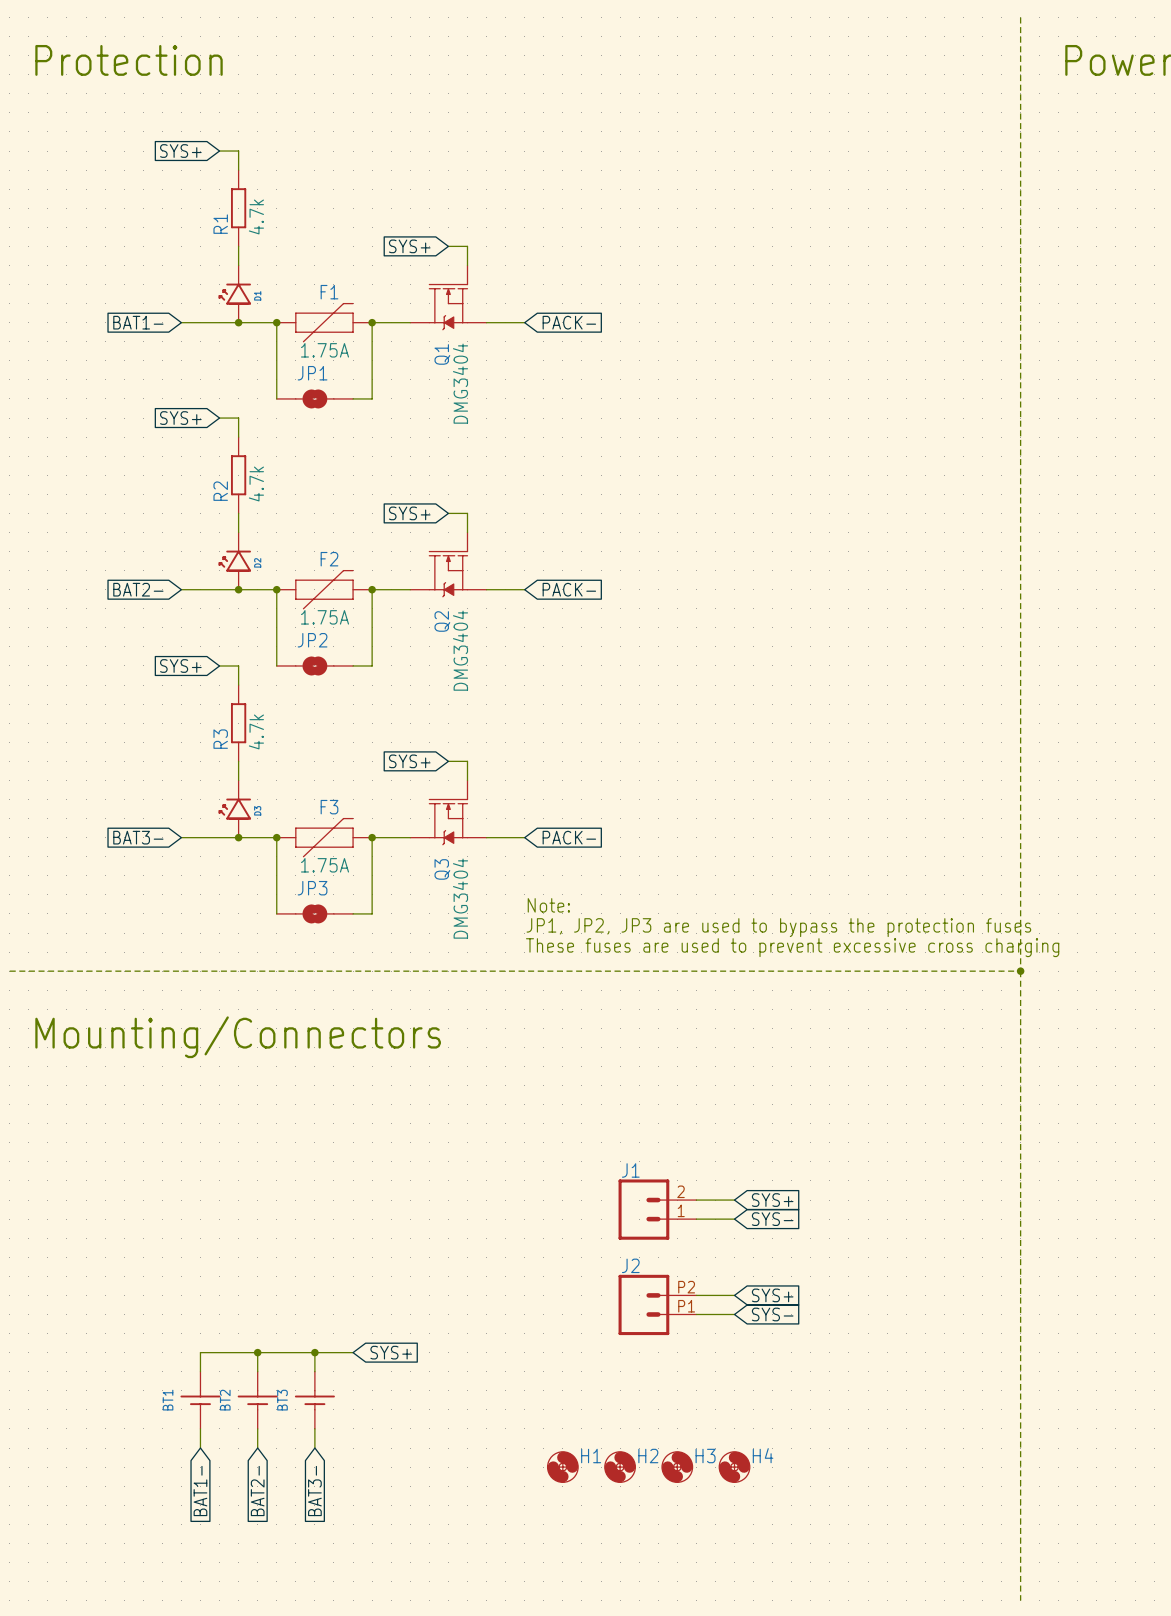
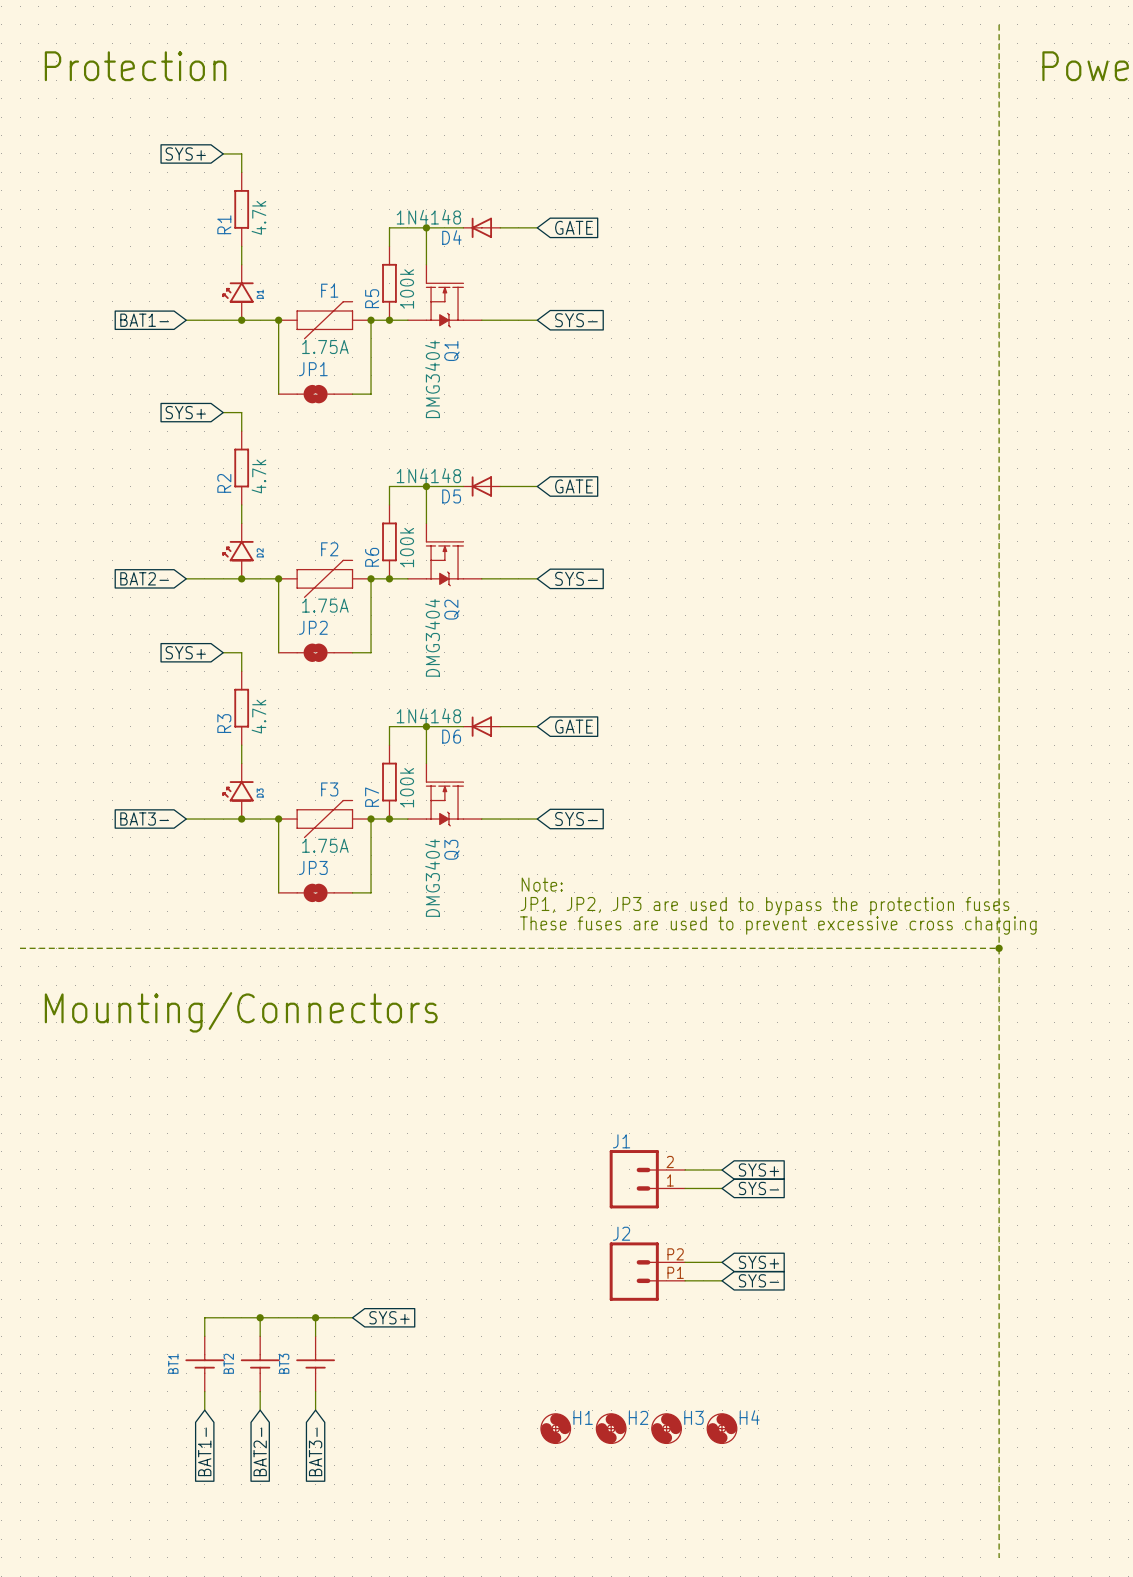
wire: none -> (426, 227) (426, 264)
junction: none -> (426, 227)
wire: none -> (463, 227) (389, 227) (389, 246)
D4: none -> 1N4148 (481, 227)
wire: none -> (500, 227) (537, 227)
global label: none -> GATE (573, 227)
global label: SYS+ (409, 246) -> none
wire: (448, 246) (467, 246) (467, 265) -> none
R5: none -> 100k (389, 283)
Q1 flip: as is (448, 307) -> left-right (444, 305)
junction: none -> (389, 320)
wire: none -> (518, 320) (537, 320)
global label: PACK- (569, 322) -> none
global label: none -> SYS- (576, 320)
wire: none -> (426, 486) (426, 523)
junction: none -> (426, 486)
wire: none -> (463, 486) (389, 486) (389, 504)
D5: none -> 1N4148 (481, 486)
wire: none -> (500, 486) (537, 486)
global label: none -> GATE (573, 486)
global label: SYS+ (409, 513) -> none
wire: (448, 513) (467, 513) (467, 532) -> none
R6: none -> 100k (389, 541)
Q2 flip: as is (448, 574) -> left-right (444, 563)
junction: none -> (389, 578)
wire: none -> (518, 578) (537, 578)
global label: PACK- (569, 589) -> none
global label: none -> SYS- (576, 578)
wire: none -> (426, 726) (426, 763)
junction: none -> (426, 726)
wire: none -> (463, 726) (389, 726) (389, 745)
D6: none -> 1N4148 (481, 726)
wire: none -> (500, 726) (537, 726)
global label: none -> GATE (573, 726)
global label: SYS+ (409, 761) -> none
wire: (448, 761) (467, 761) (467, 780) -> none
R7: none -> 100k (389, 782)
Q3 flip: as is (448, 822) -> left-right (444, 803)
junction: none -> (389, 819)
wire: none -> (518, 819) (537, 819)
global label: PACK- (569, 837) -> none
global label: none -> SYS- (576, 819)

